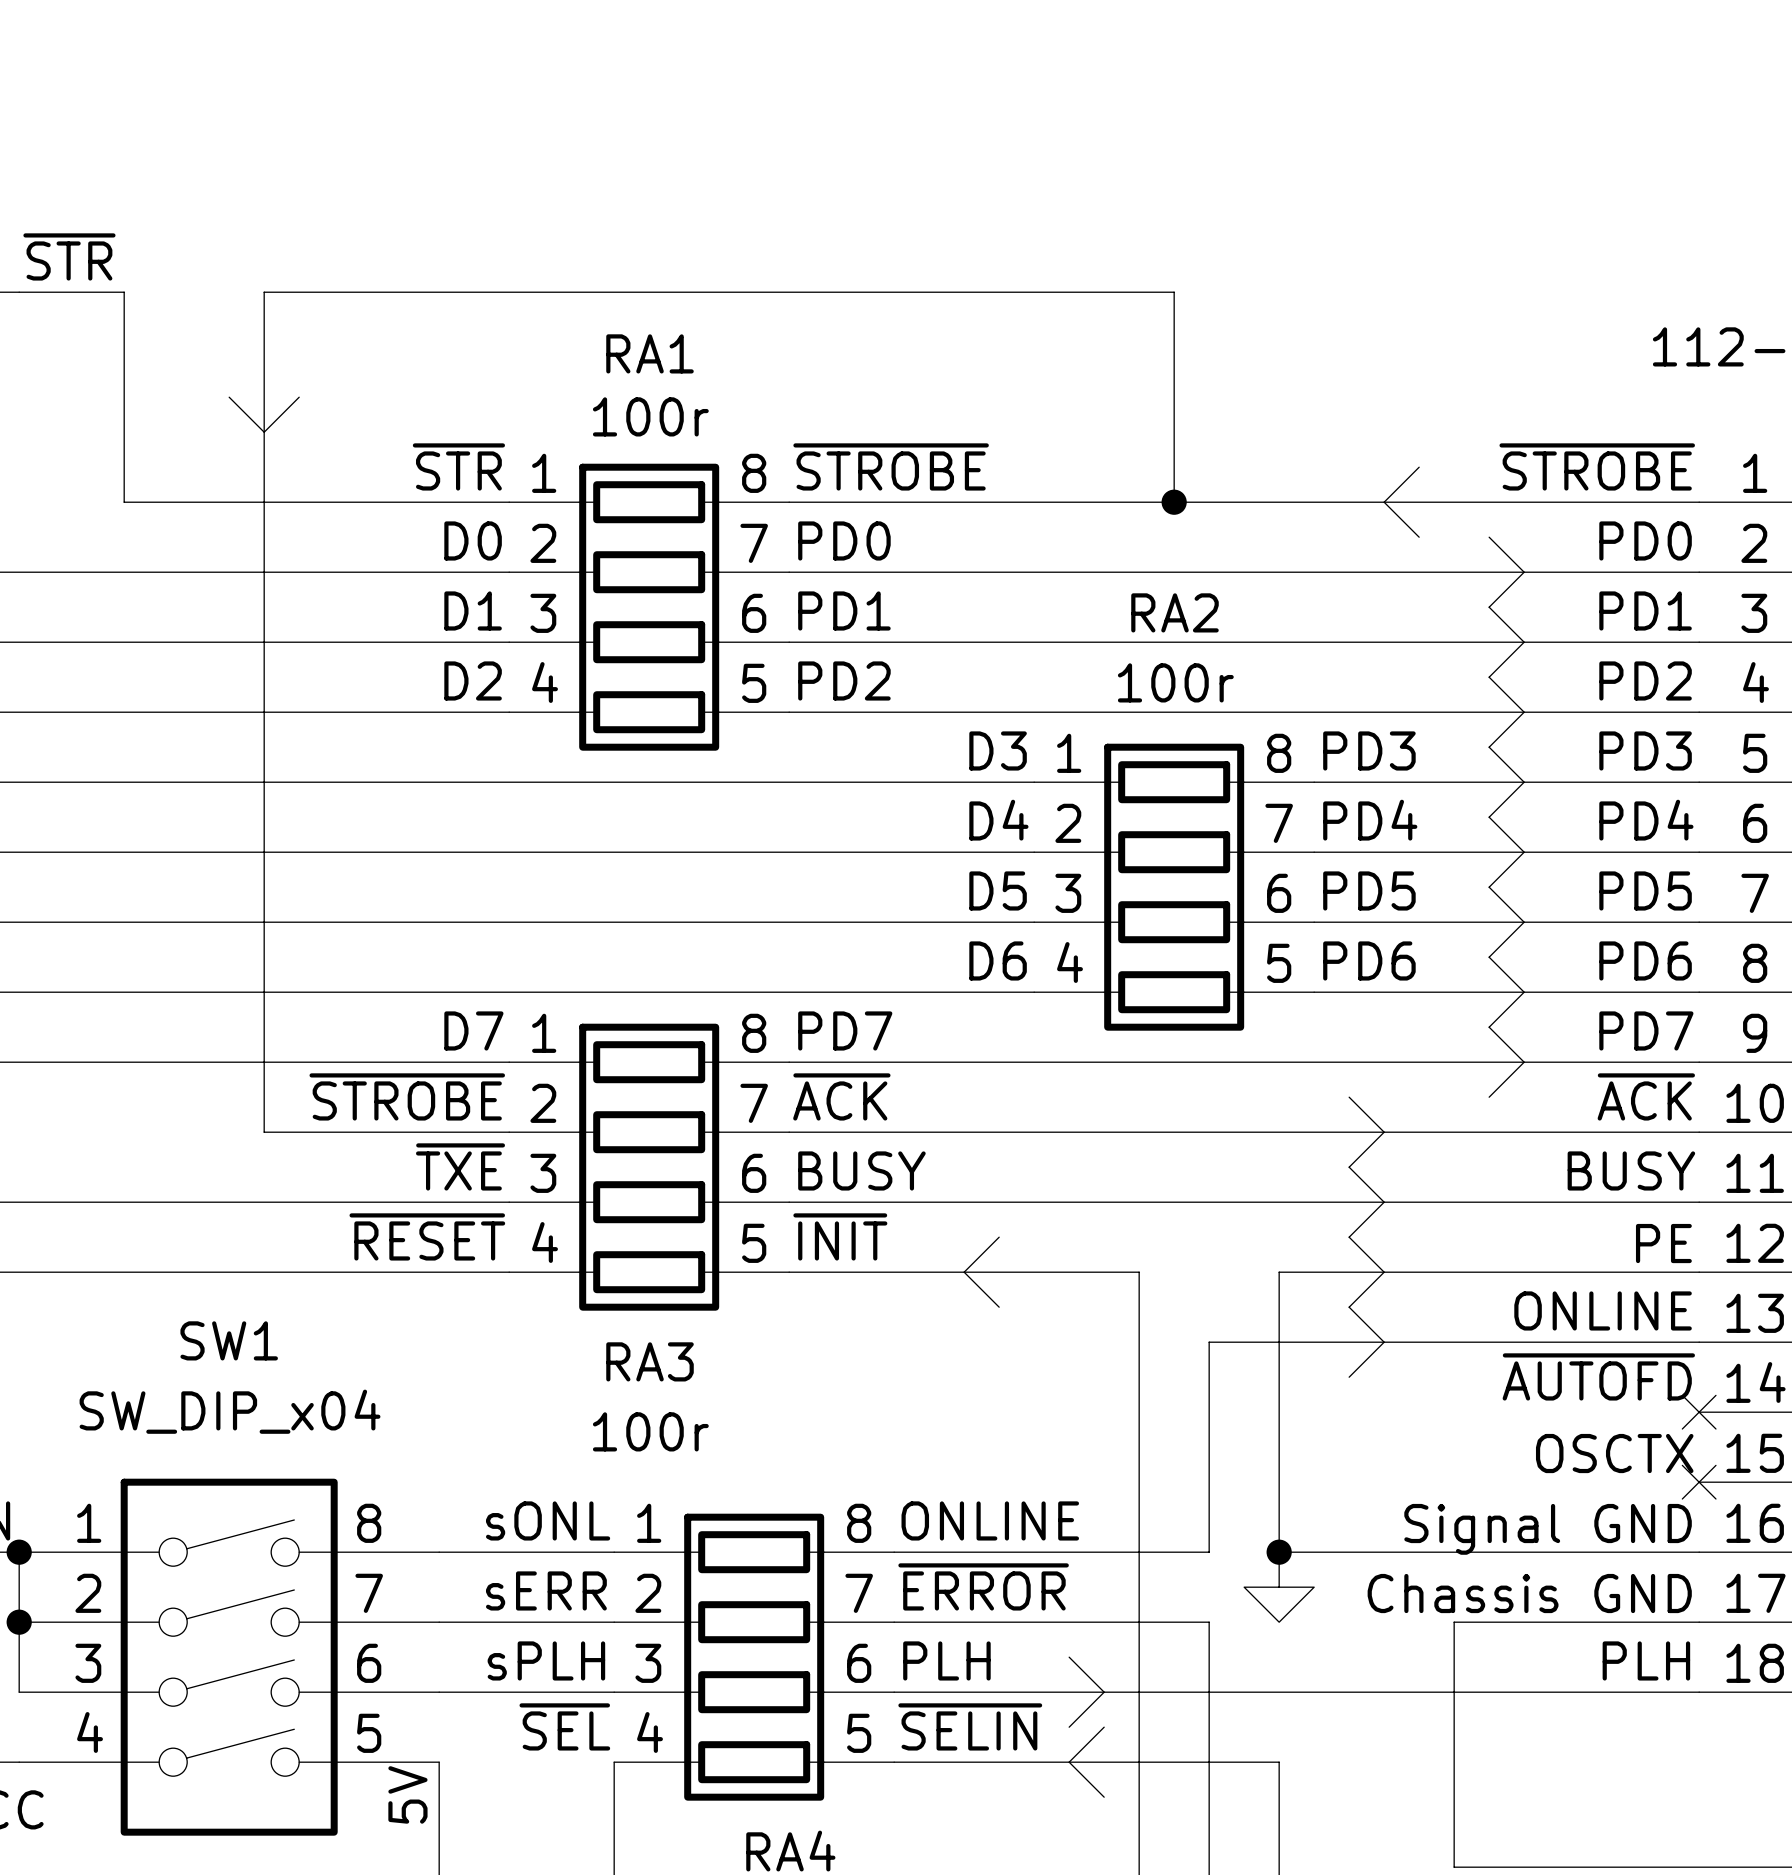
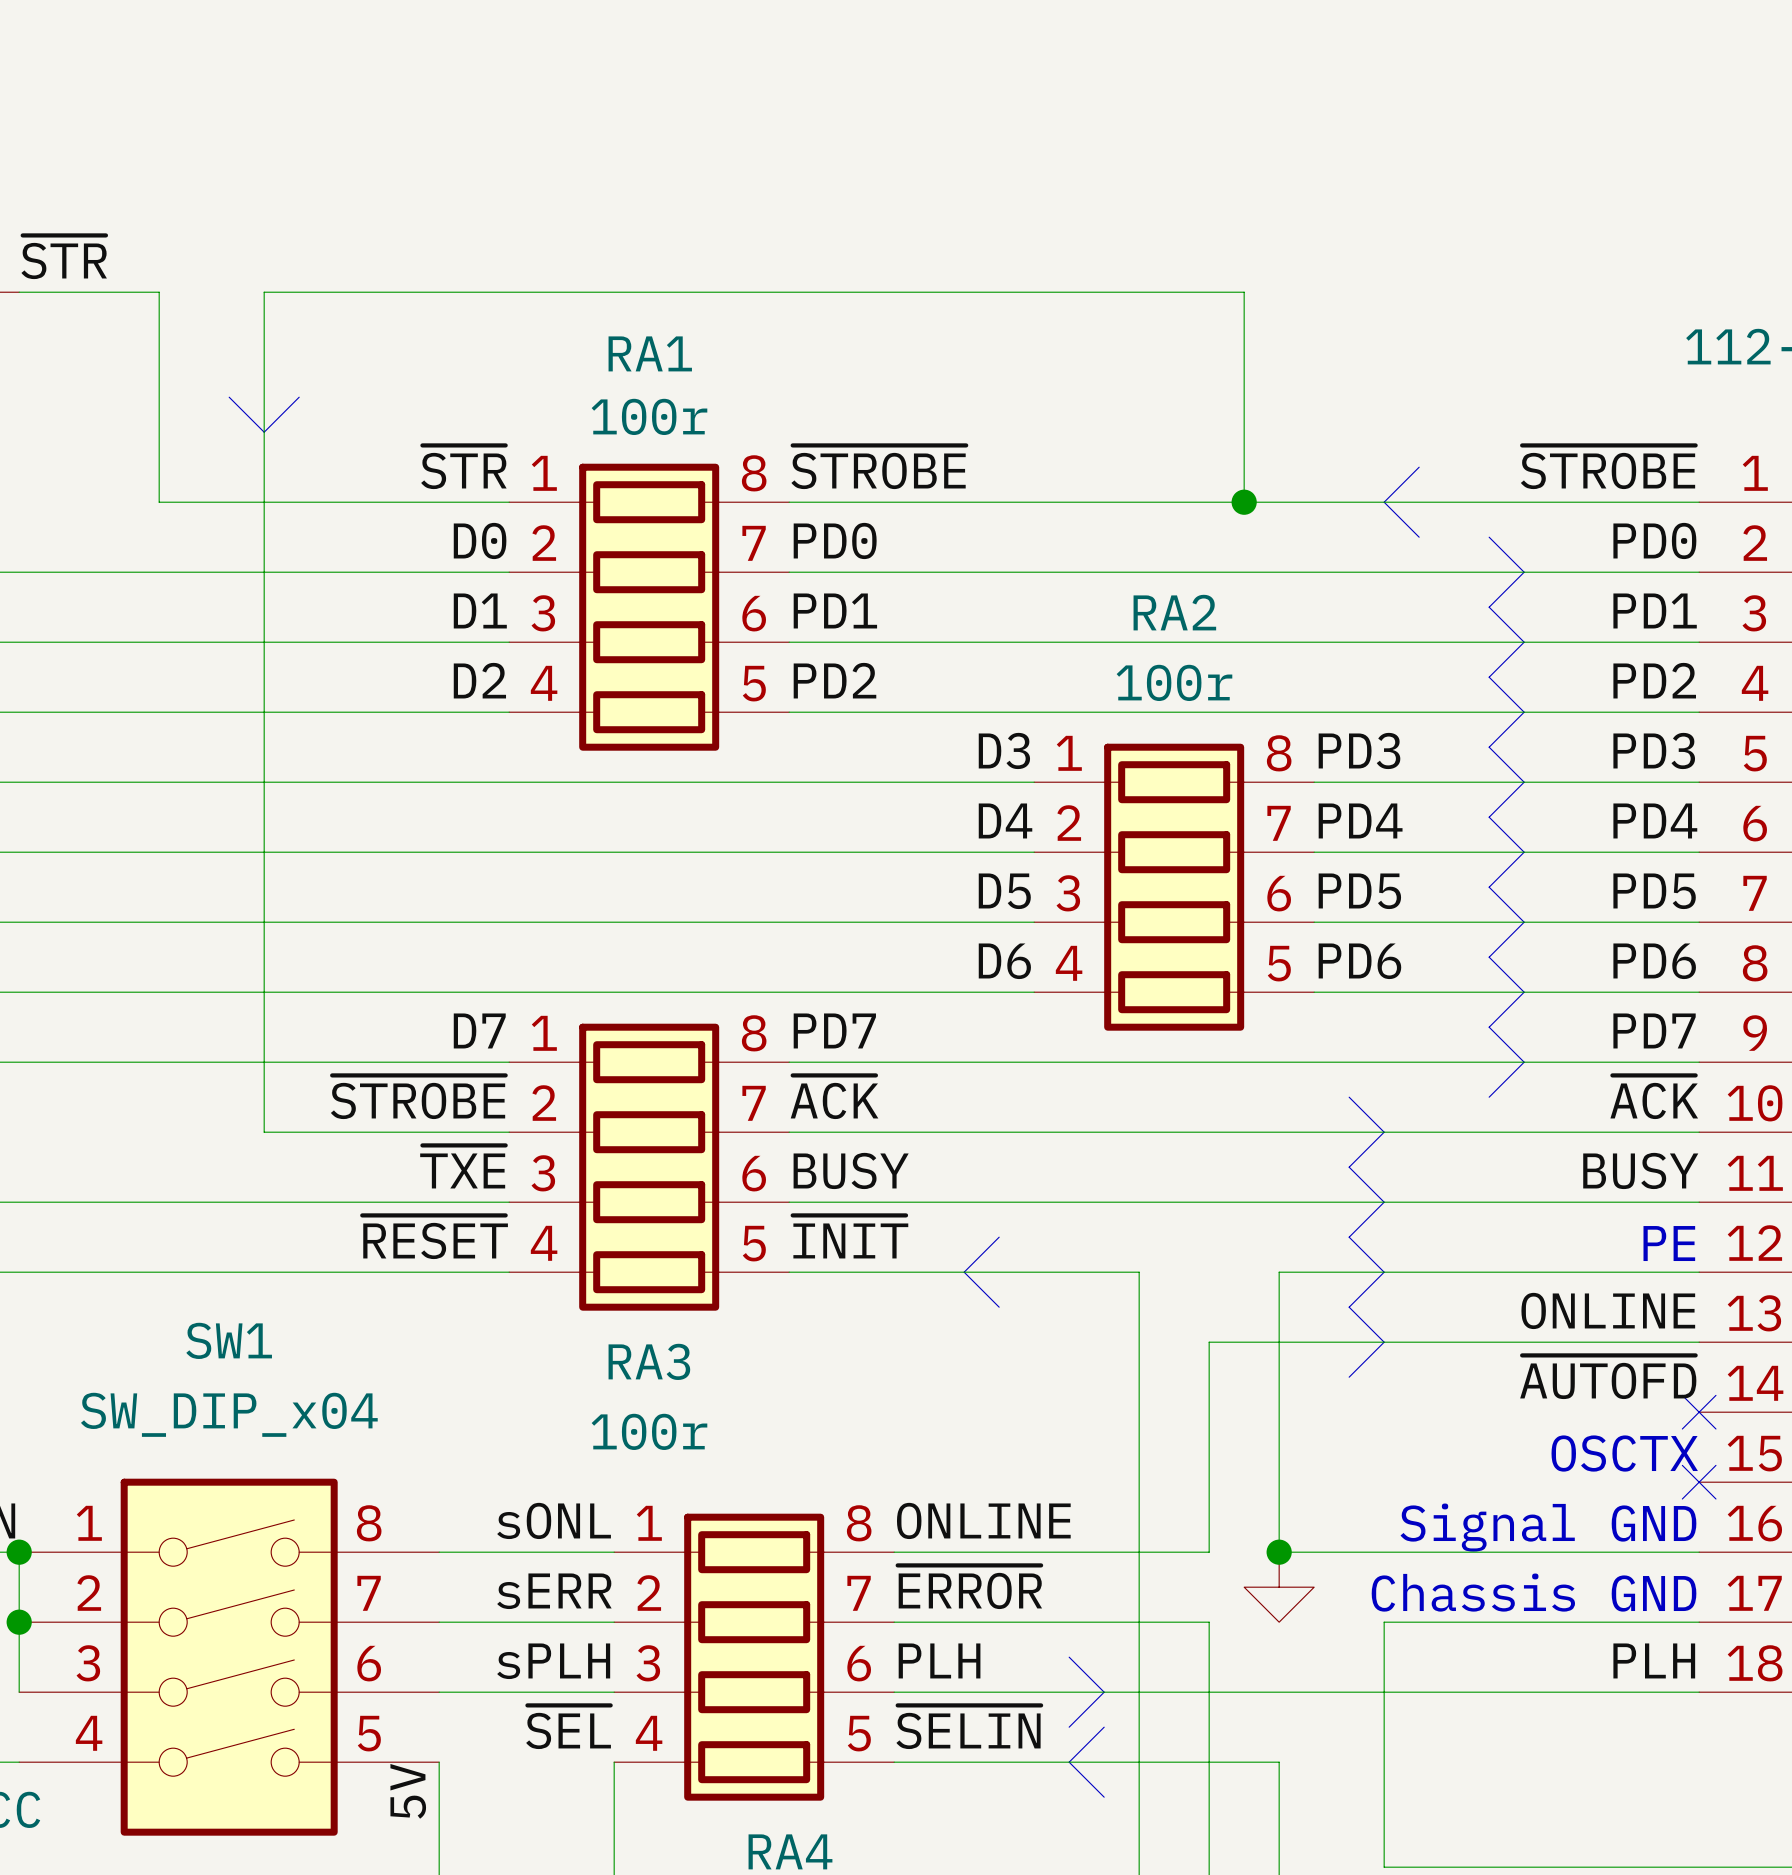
wire: (124, 292) (124, 502) (159, 502) -> (124, 292) (159, 292) (159, 502)
wire: (1174, 292) (1174, 502) -> (1174, 292) (1244, 292) (1244, 502)
junction position: (1174, 502) -> (1244, 502)
wire: (1454, 1622) (1454, 1867) -> (1454, 1622) (1384, 1622) (1384, 1867) (1454, 1867)

